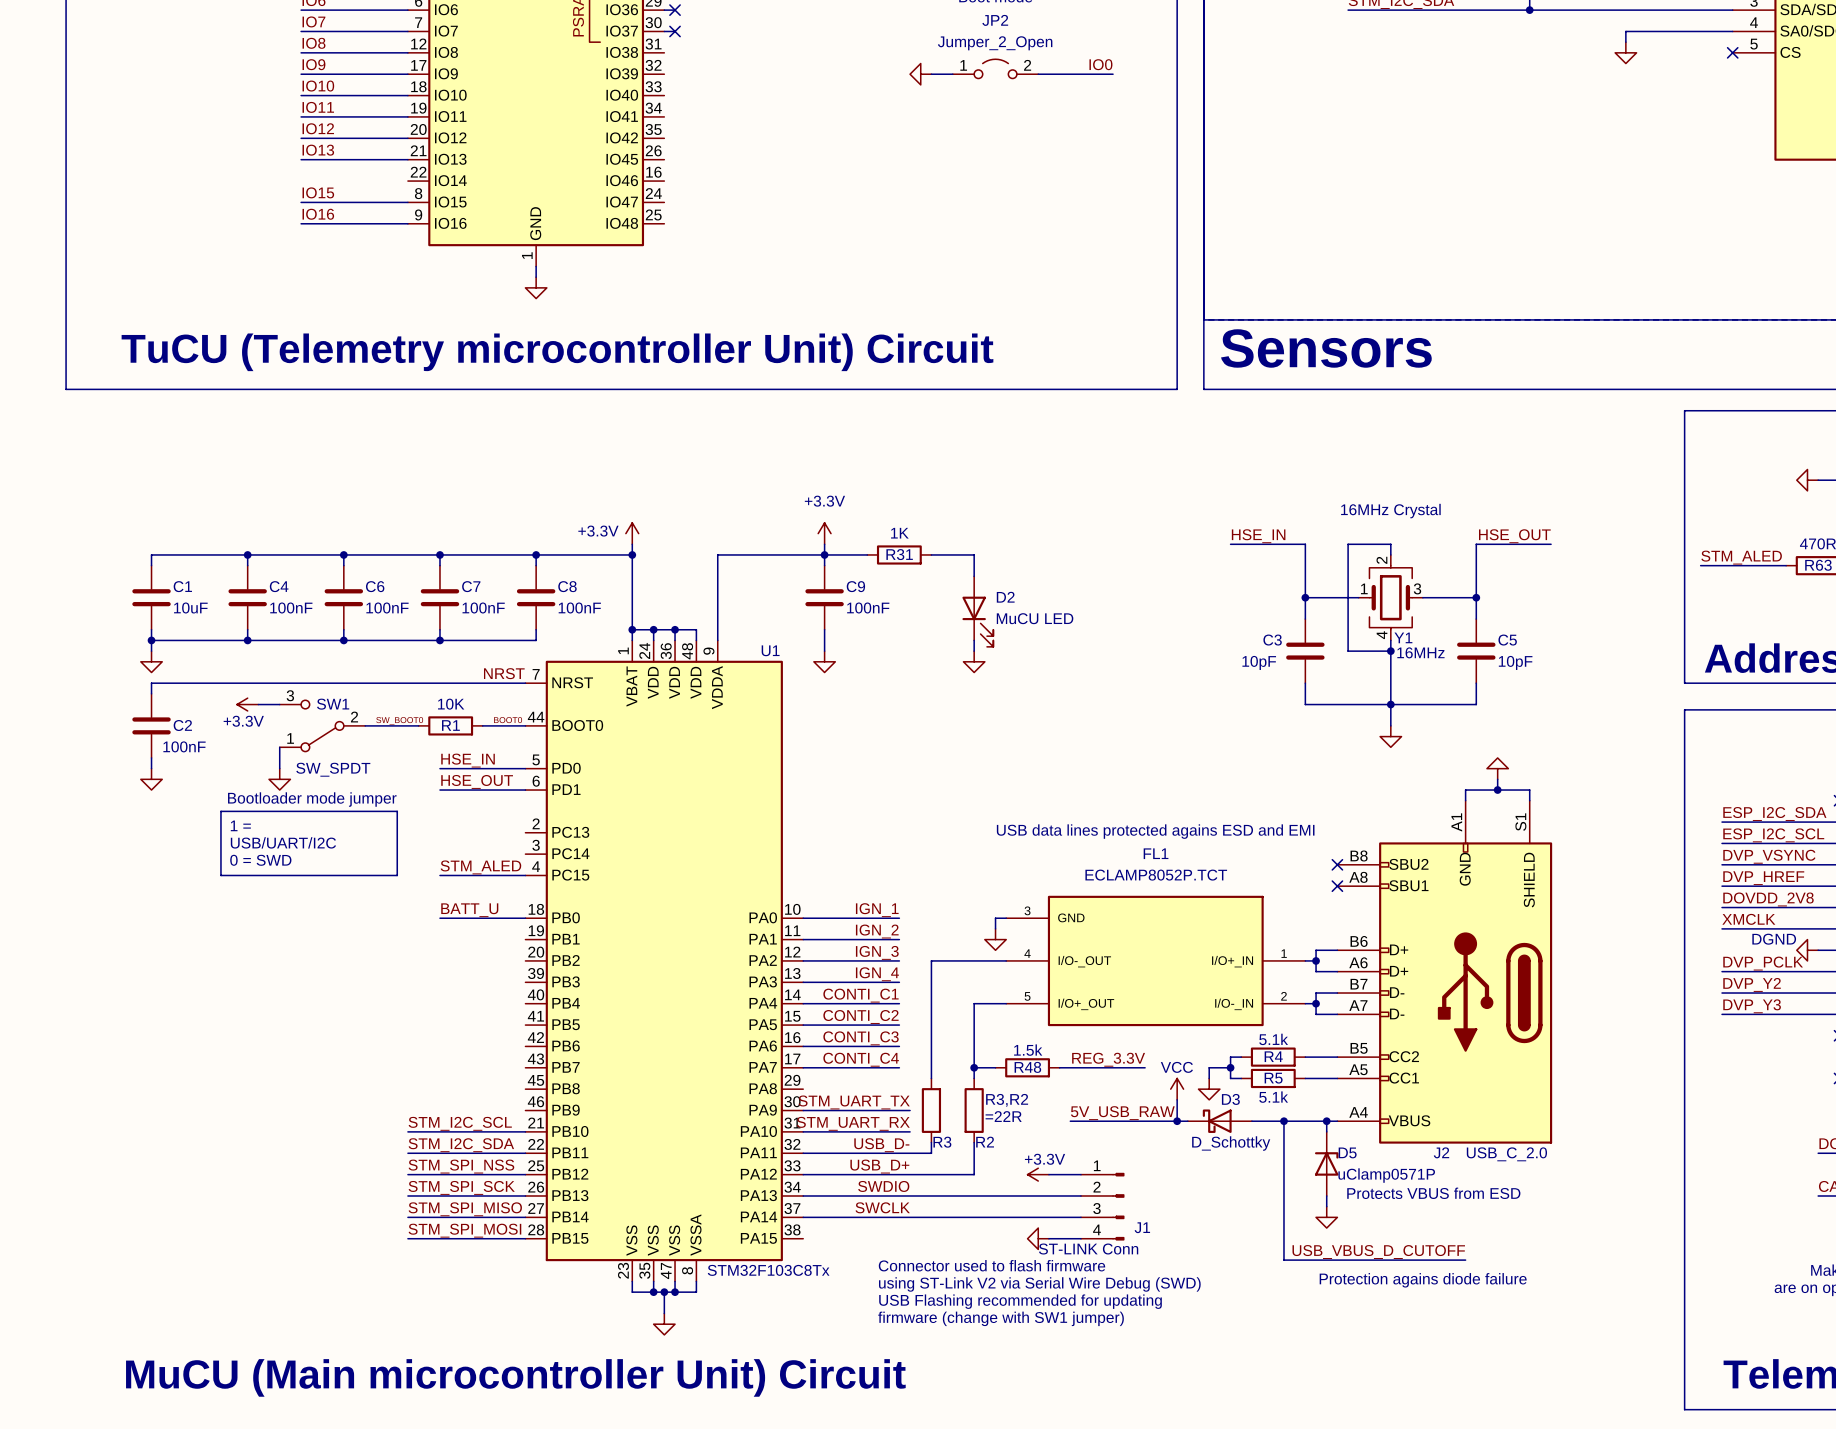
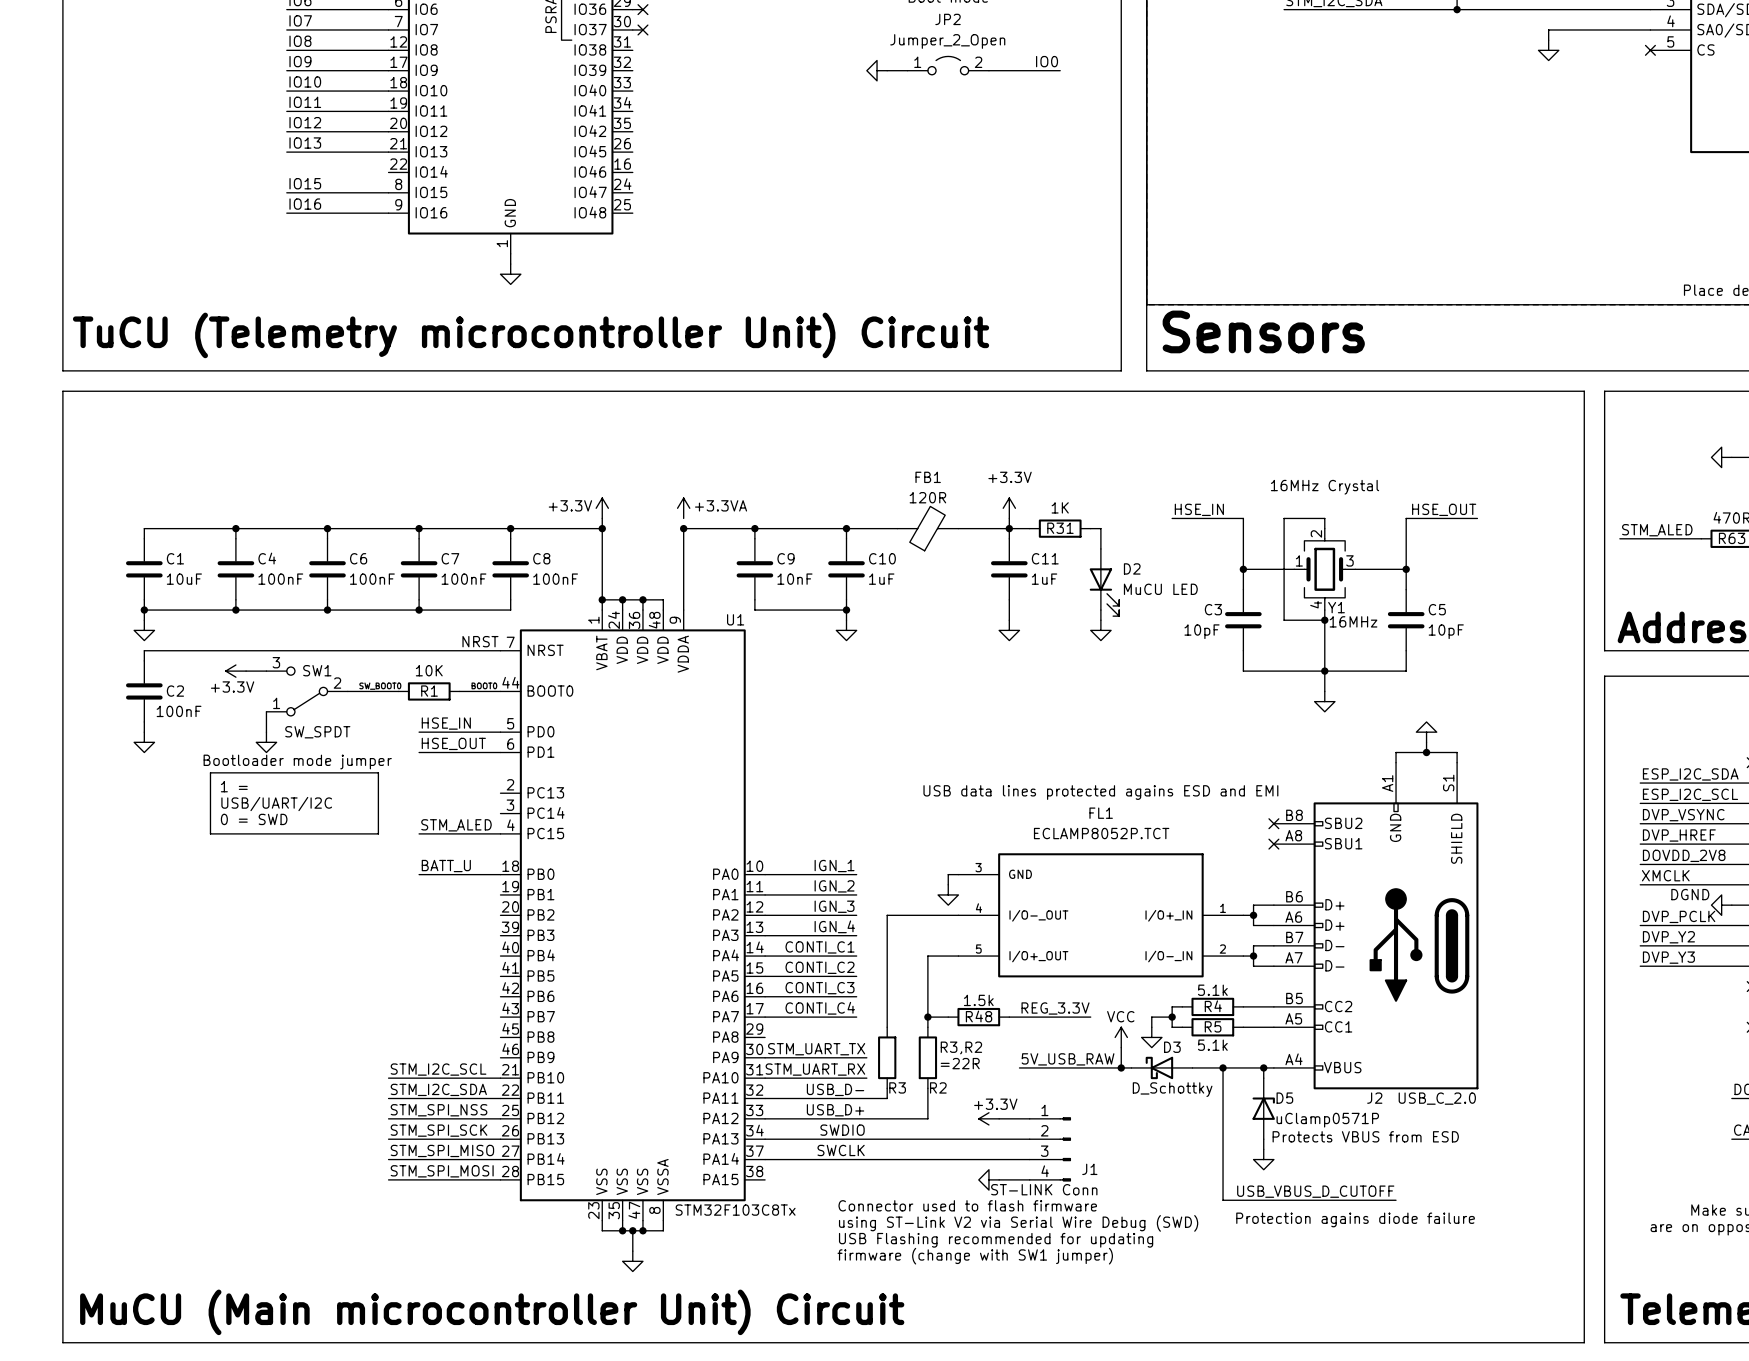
line: none -> (62, 391) (1584, 391) (1584, 1342) (62, 1342) (62, 391)
power symbol: none -> +3.3VA (683, 508)
power symbol: +3.3V (824, 533) -> none
power symbol: none -> +3.3V (1009, 508)
wire: (824, 544) (824, 565) -> none
wire: none -> (1009, 518) (1009, 538)
junction: none -> (683, 528)
wire: none -> (754, 528) (754, 538)
junction: none -> (754, 528)
junction: (824, 554) -> none
wire: none -> (826, 528) (887, 528)
junction: none -> (846, 528)
R31 position: (899, 554) -> (1060, 528)
wire: (942, 554) (974, 554) (974, 576) -> none
FB1: none -> 120R (927, 528)
wire: none -> (958, 528) (1029, 528)
junction: none -> (1009, 528)
wire: none -> (1090, 528) (1100, 528) (1100, 548)
C9 position: (824, 597) -> (754, 569)
C10: none -> 1uF (846, 569)
C11: none -> 1uF (1009, 569)
C9 value: 100nF (868, 607) -> 10nF (794, 579)
D2 position: (977, 611) -> (1104, 582)
wire: none -> (754, 599) (754, 610) (846, 610)
wire: (824, 629) (824, 651) -> (846, 599) (846, 620)
wire: none -> (1009, 599) (1009, 620)
junction: none -> (846, 610)
wire: (974, 640) (974, 651) -> (846, 528) (846, 538)
wire: none -> (1100, 610) (1100, 620)
power symbol: (824, 661) -> none
power symbol: none -> (846, 630)
power symbol: (974, 661) -> none
power symbol: none -> (1009, 630)
power symbol: none -> (1100, 630)

